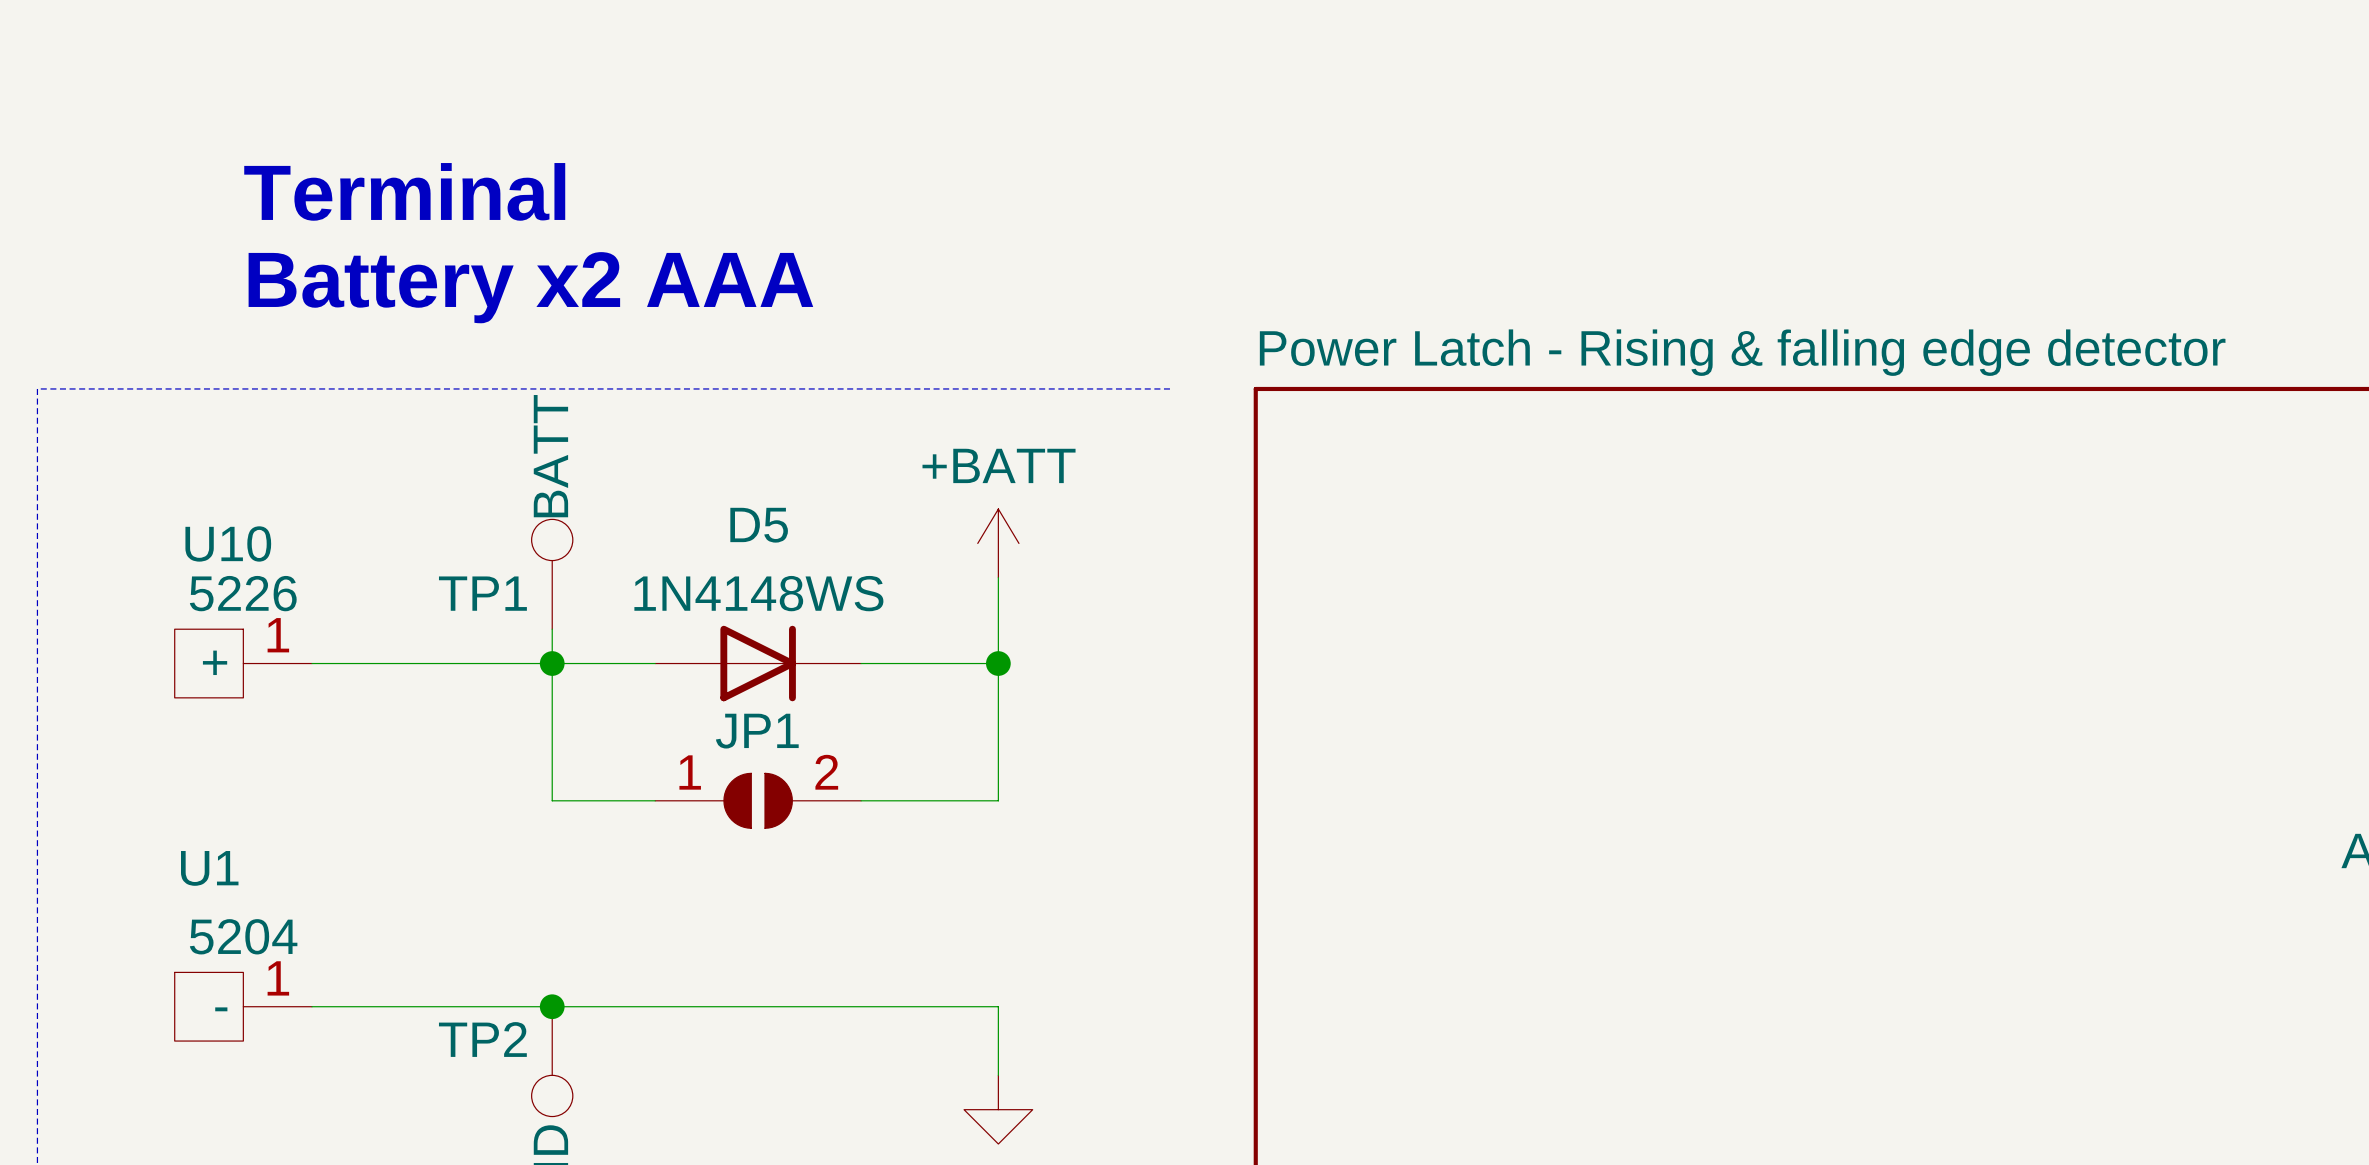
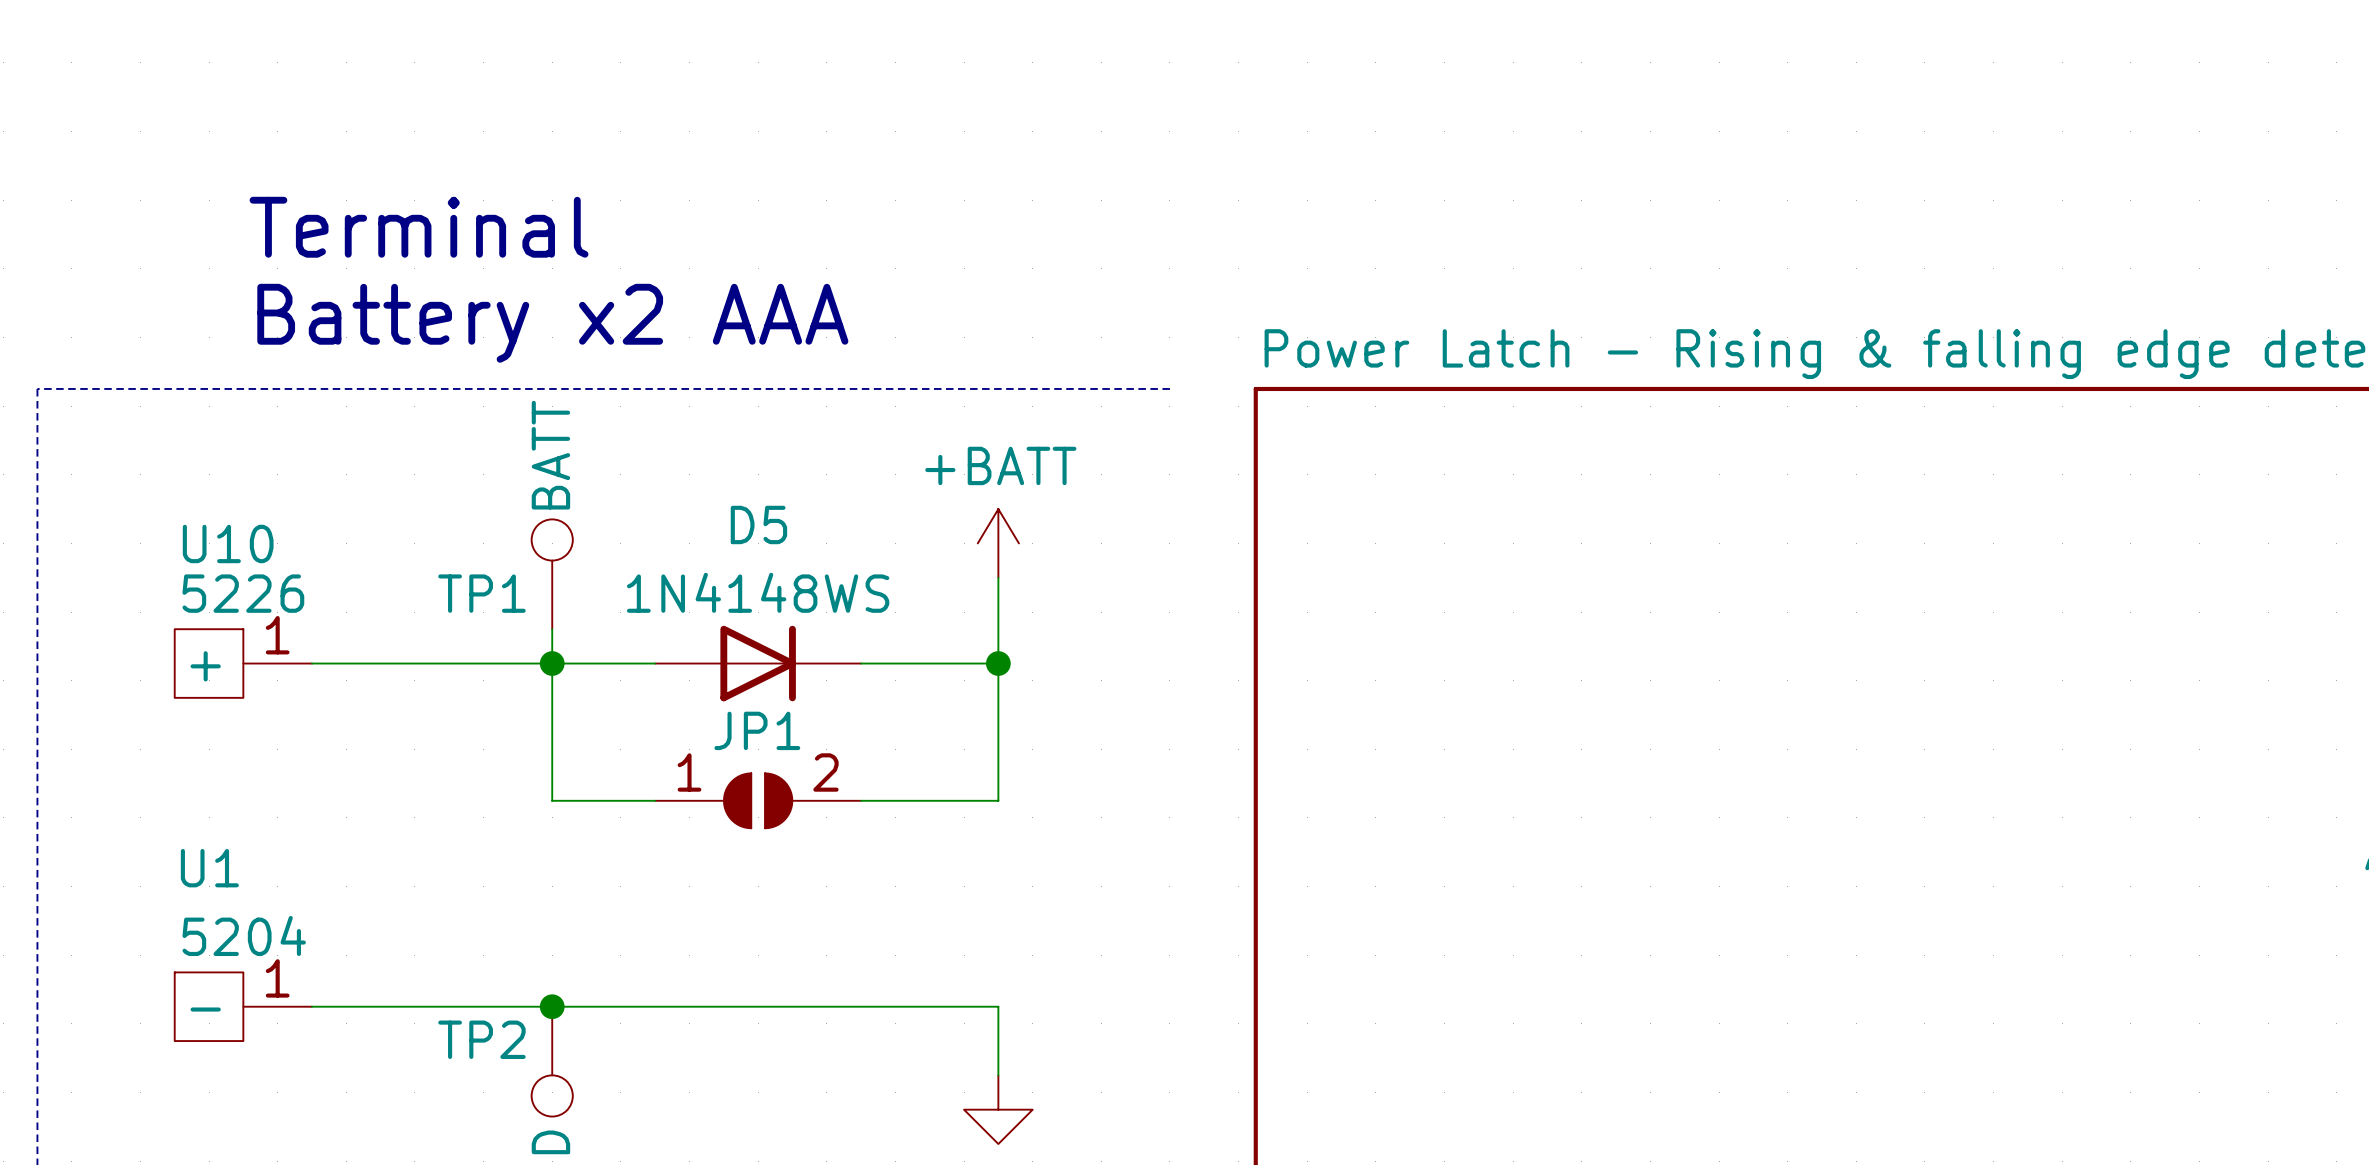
text position: Terminal (404, 191) -> Terminal (419, 227)
text position: Battery x2 AAA (530, 287) -> Battery x2 AAA (552, 323)

